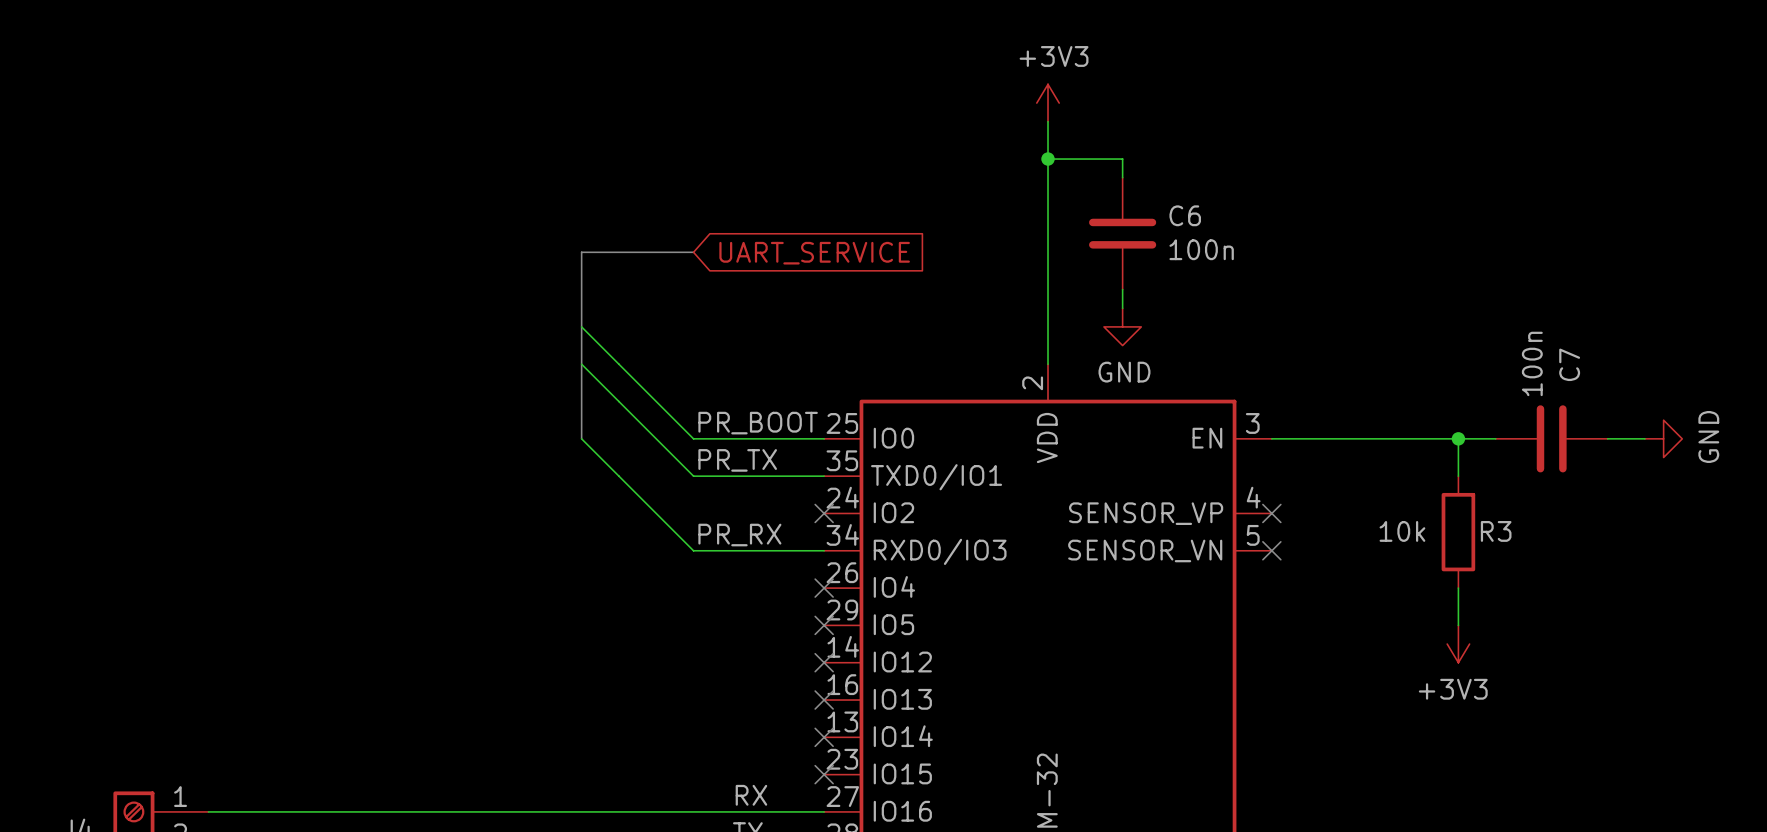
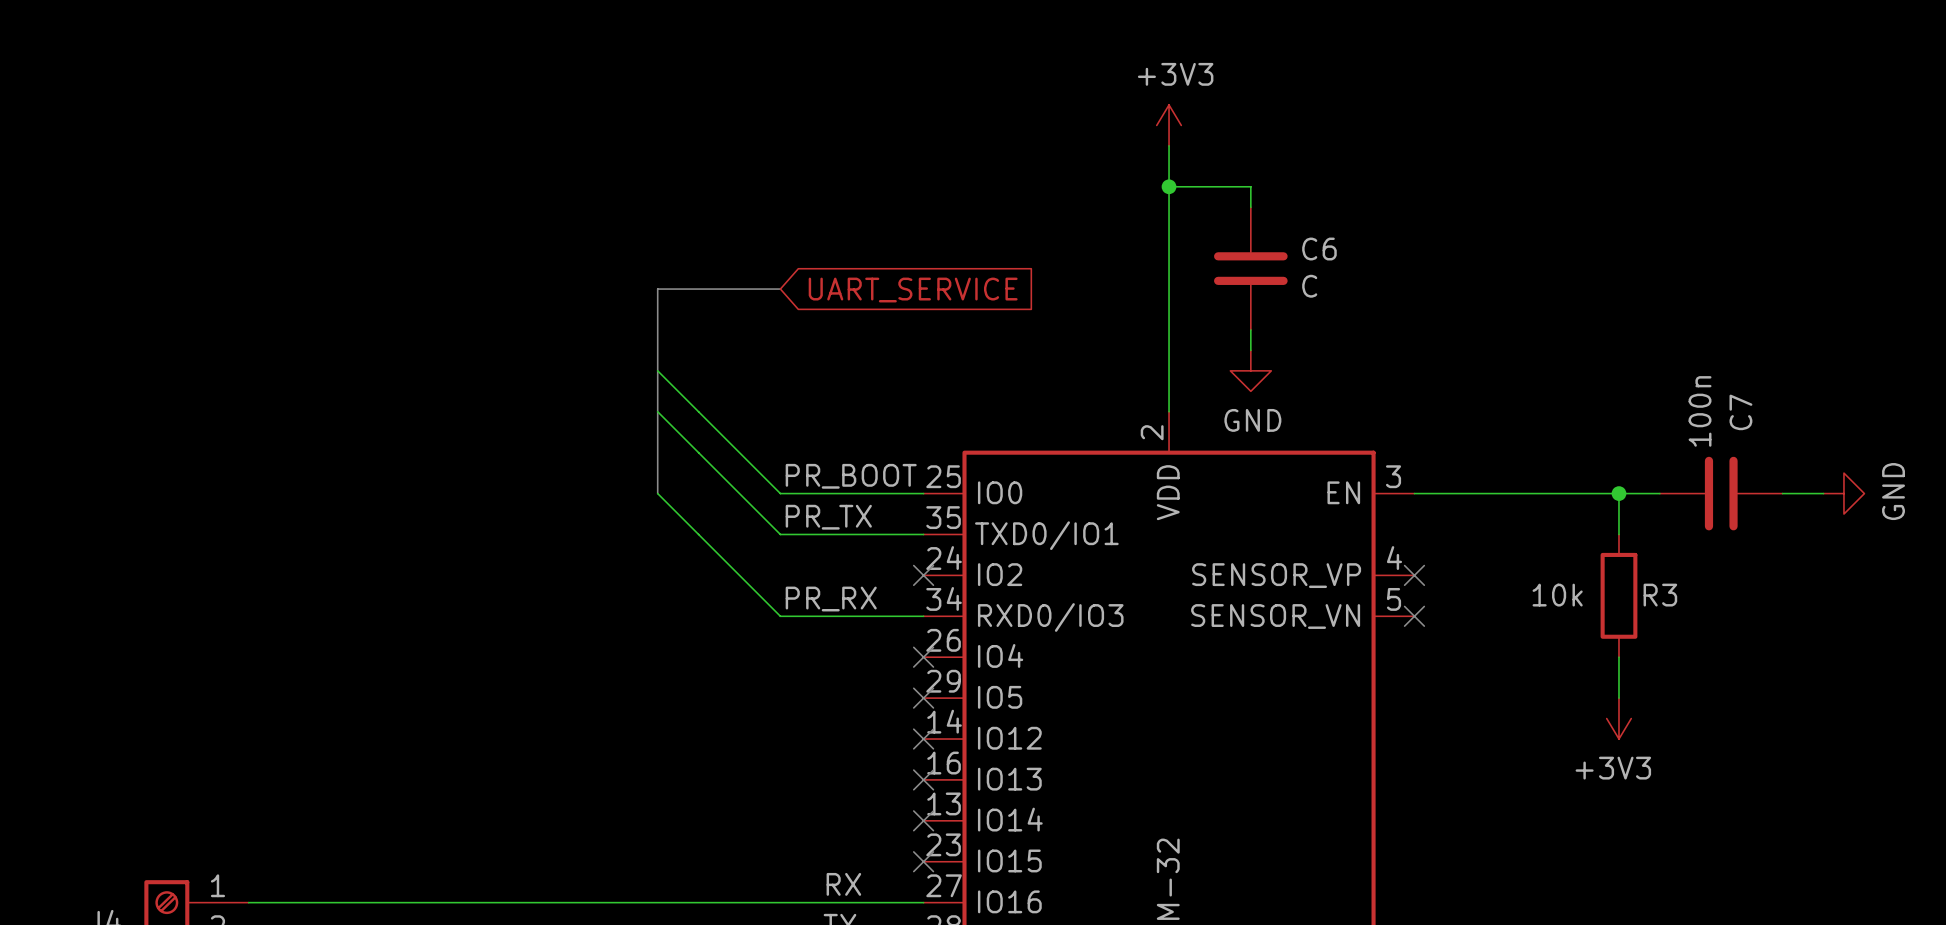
C6 value: 100n (1201, 249) -> C (1309, 286)

